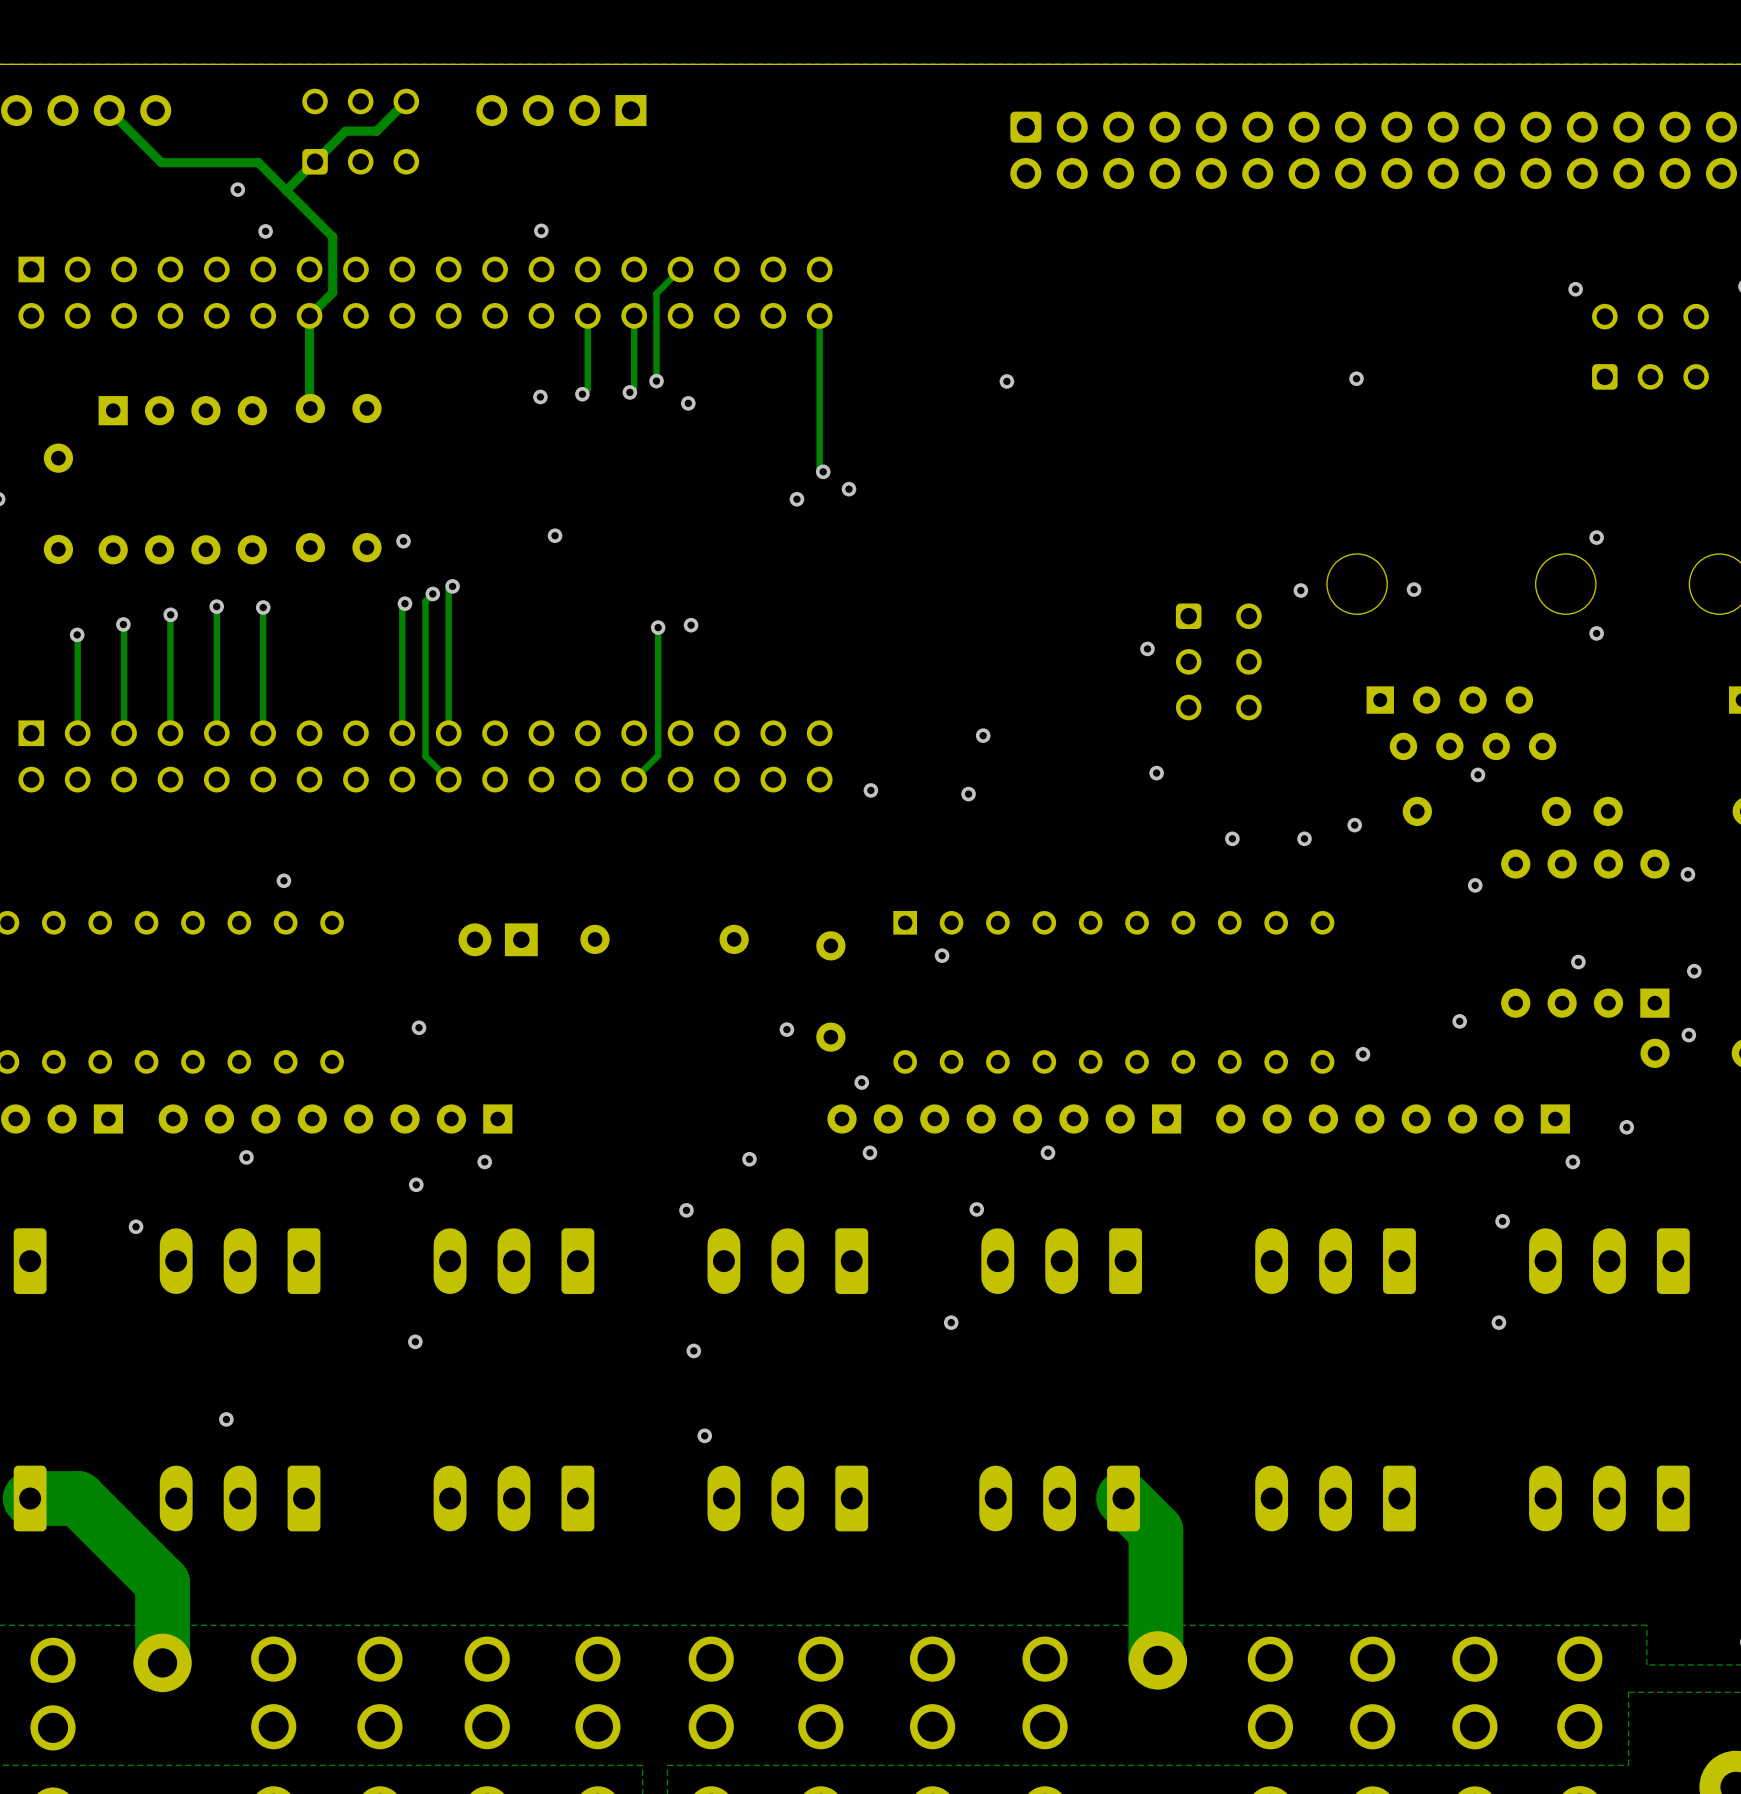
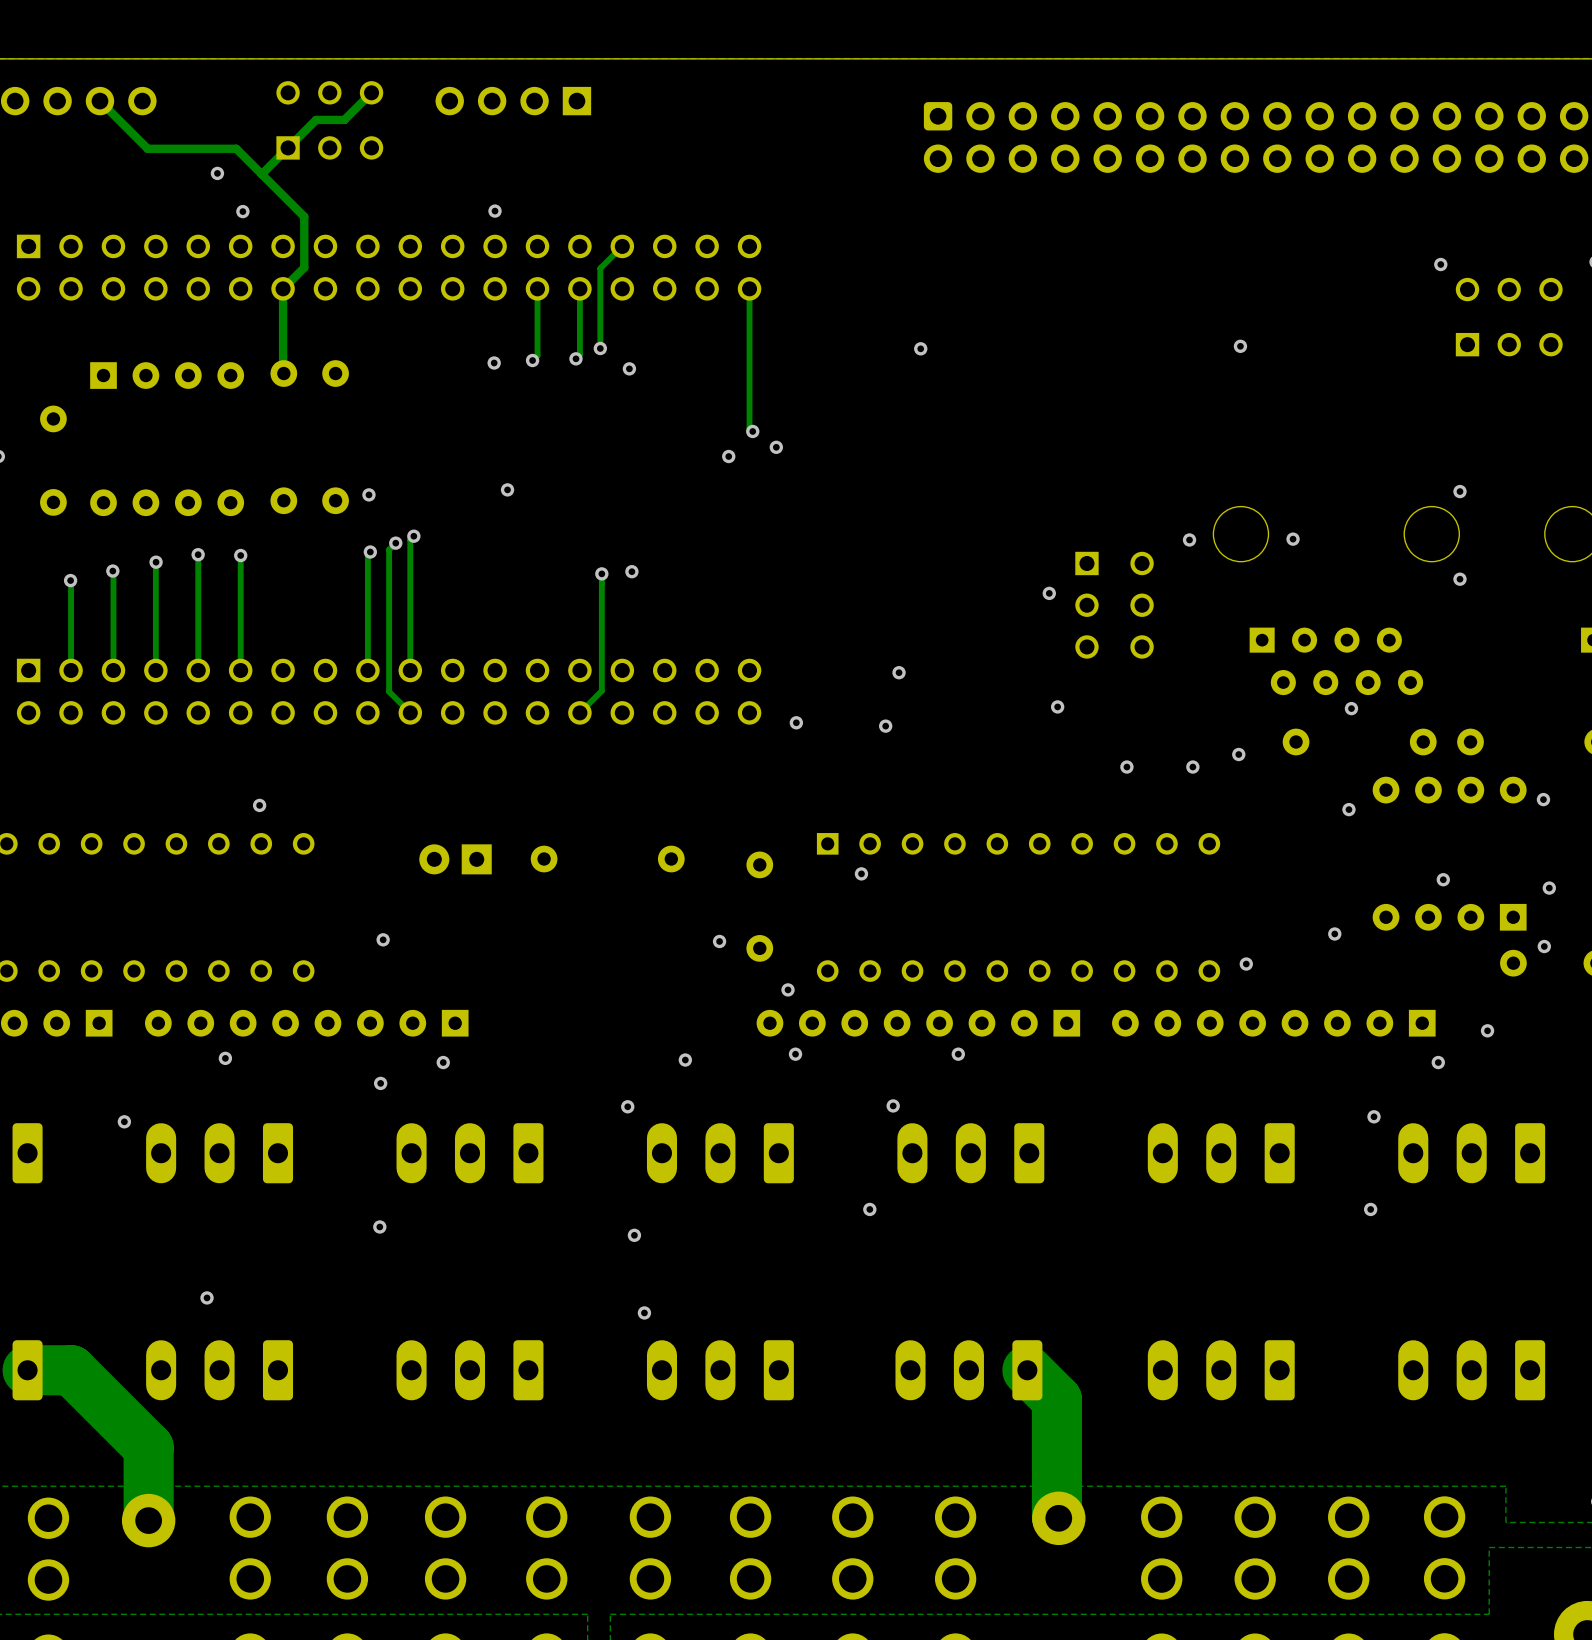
part footprint: [302, 88, 420, 175] -> [276, 81, 384, 160]
part footprint: [1592, 303, 1709, 390] -> [1455, 277, 1563, 357]
part footprint: [1175, 603, 1262, 721] -> [1075, 551, 1154, 659]

